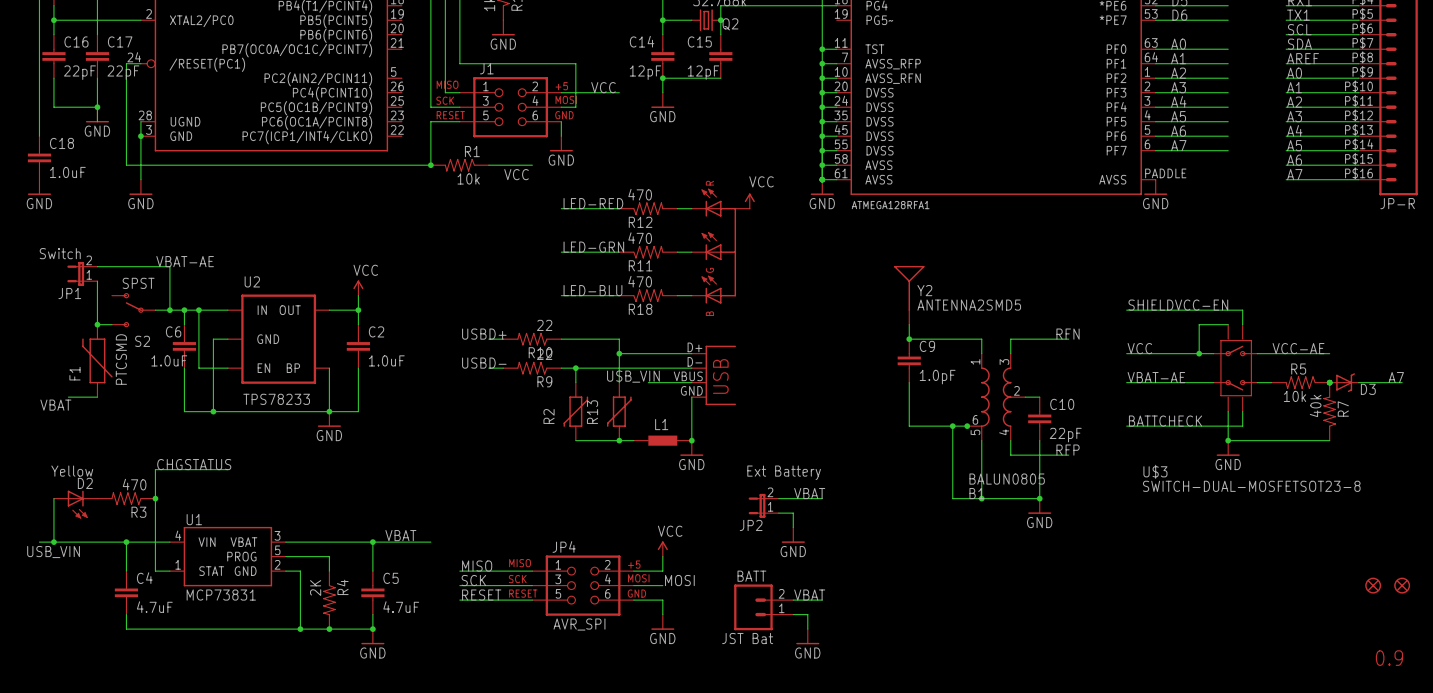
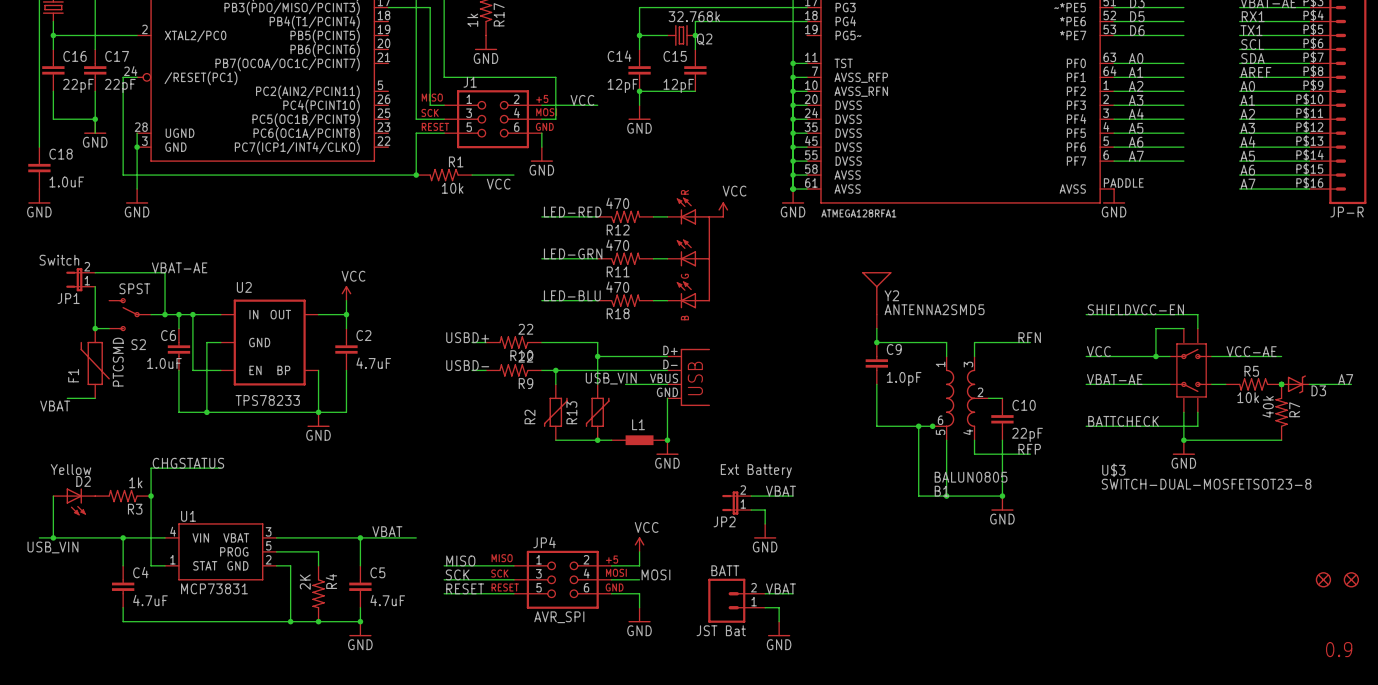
C2 value: 1.0uF (386, 360) -> 4.7uF (373, 363)
R3 value: 470 (134, 484) -> 1k (135, 482)

